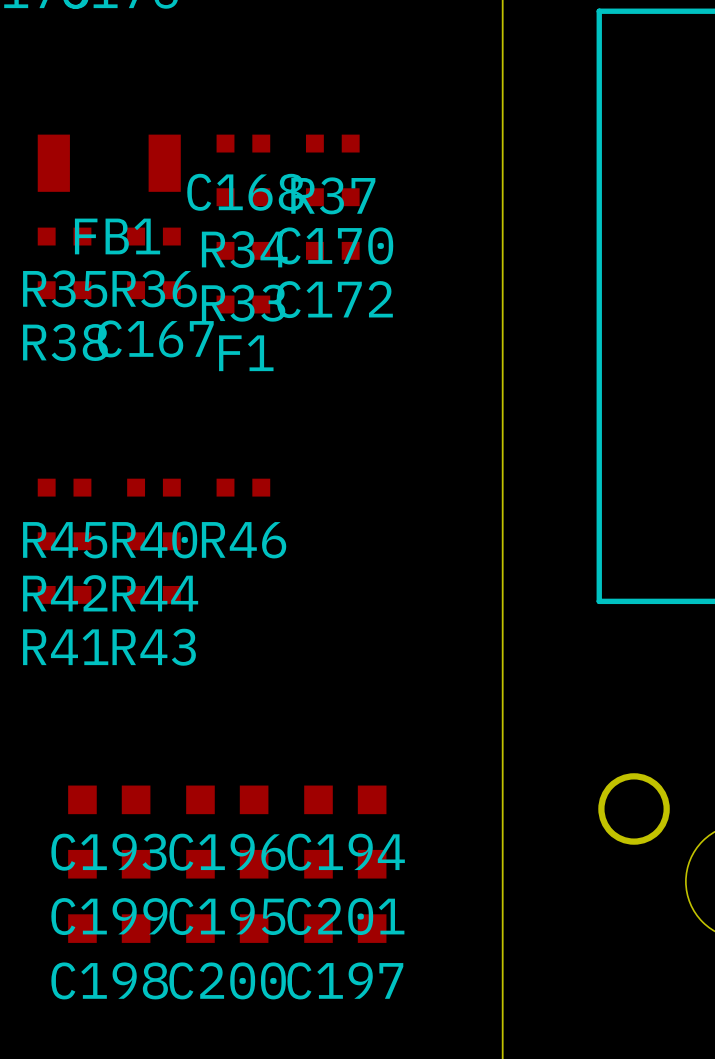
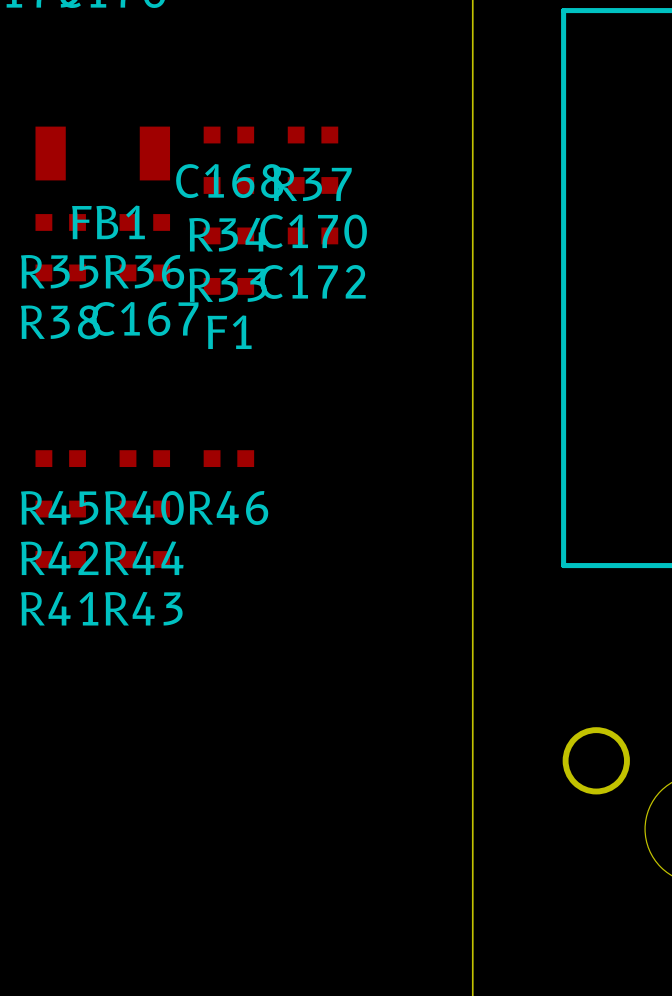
C193: (109, 799) -> none
C196: (227, 799) -> none
C194: (345, 799) -> none
C199: (109, 864) -> none
C195: (227, 864) -> none
C201: (345, 864) -> none
C198: (109, 928) -> none
C200: (227, 928) -> none
C197: (345, 928) -> none

